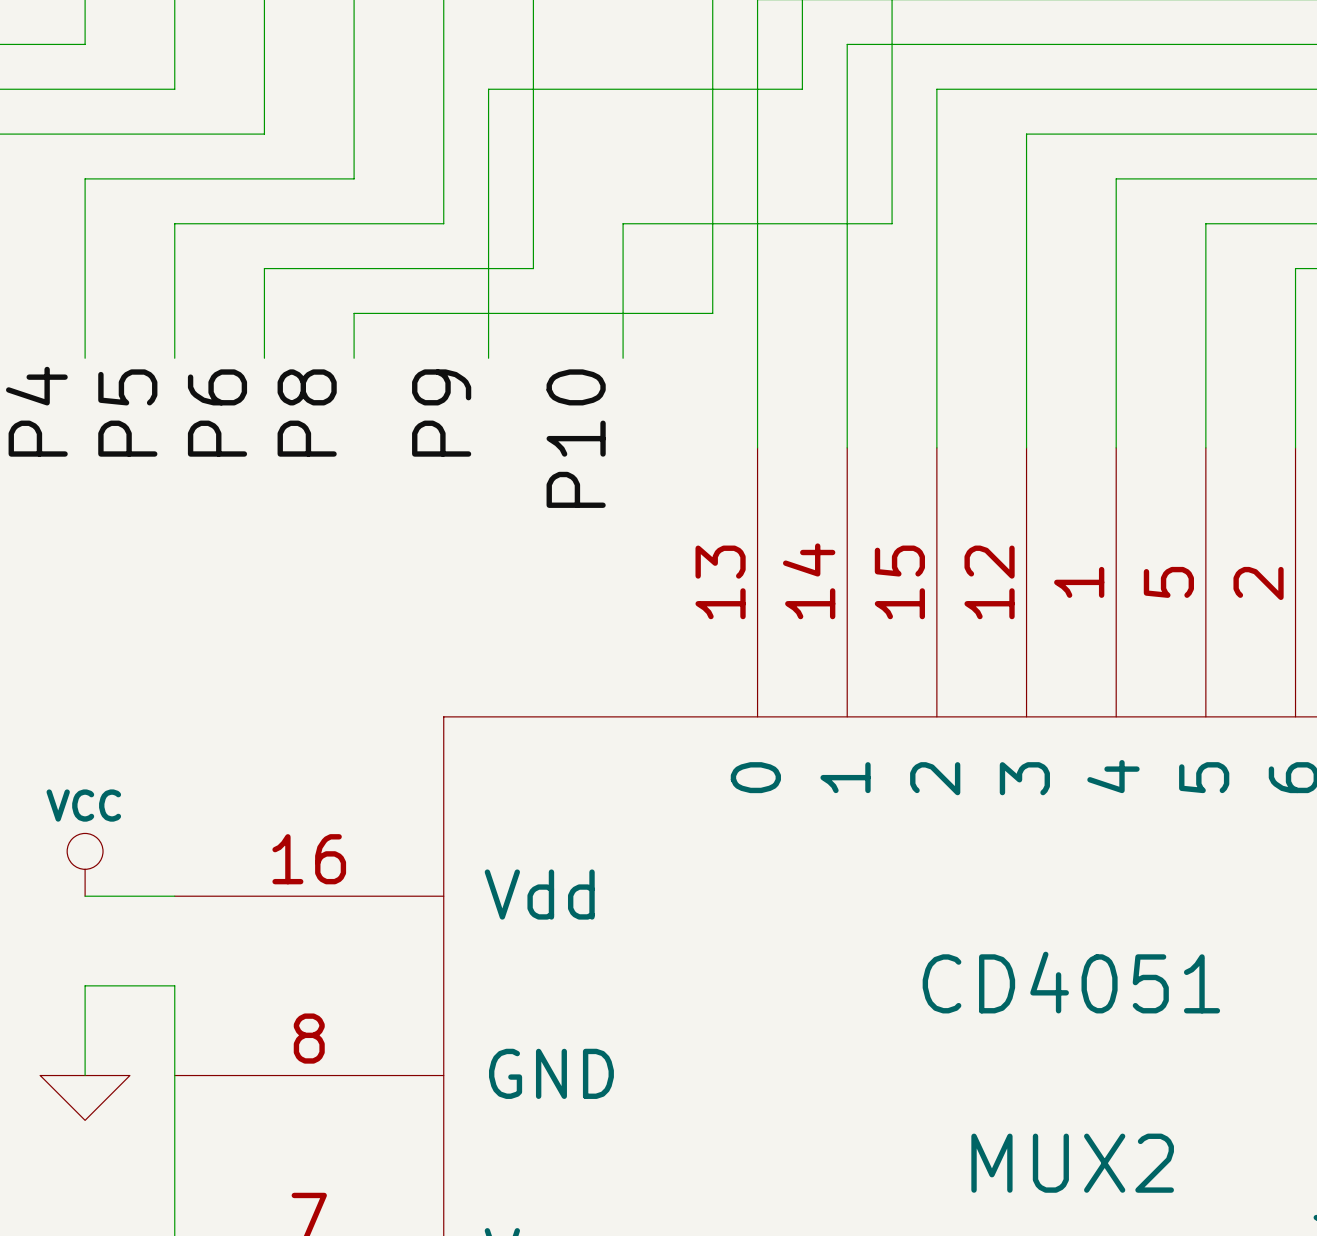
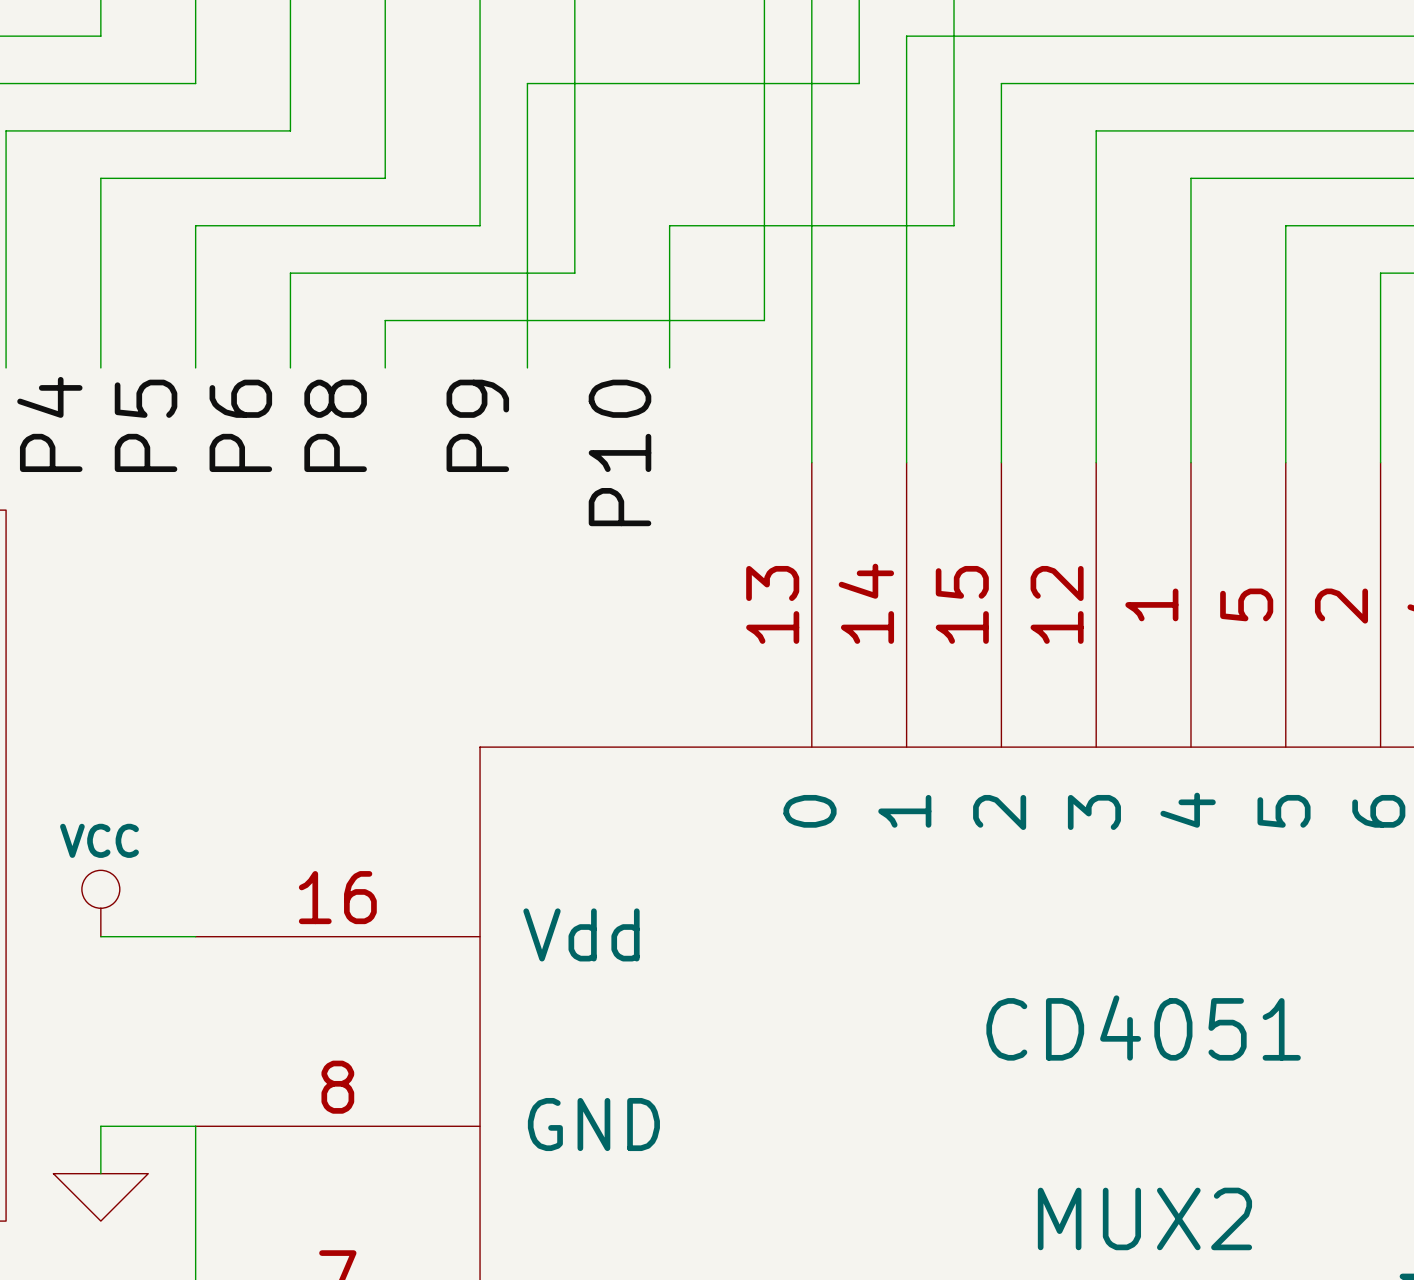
wire: (85, 1075) (85, 985) (174, 985) (174, 1075) -> (100, 1173) (100, 1126) (195, 1126)
power symbol position: (85, 1097) -> (100, 1197)

